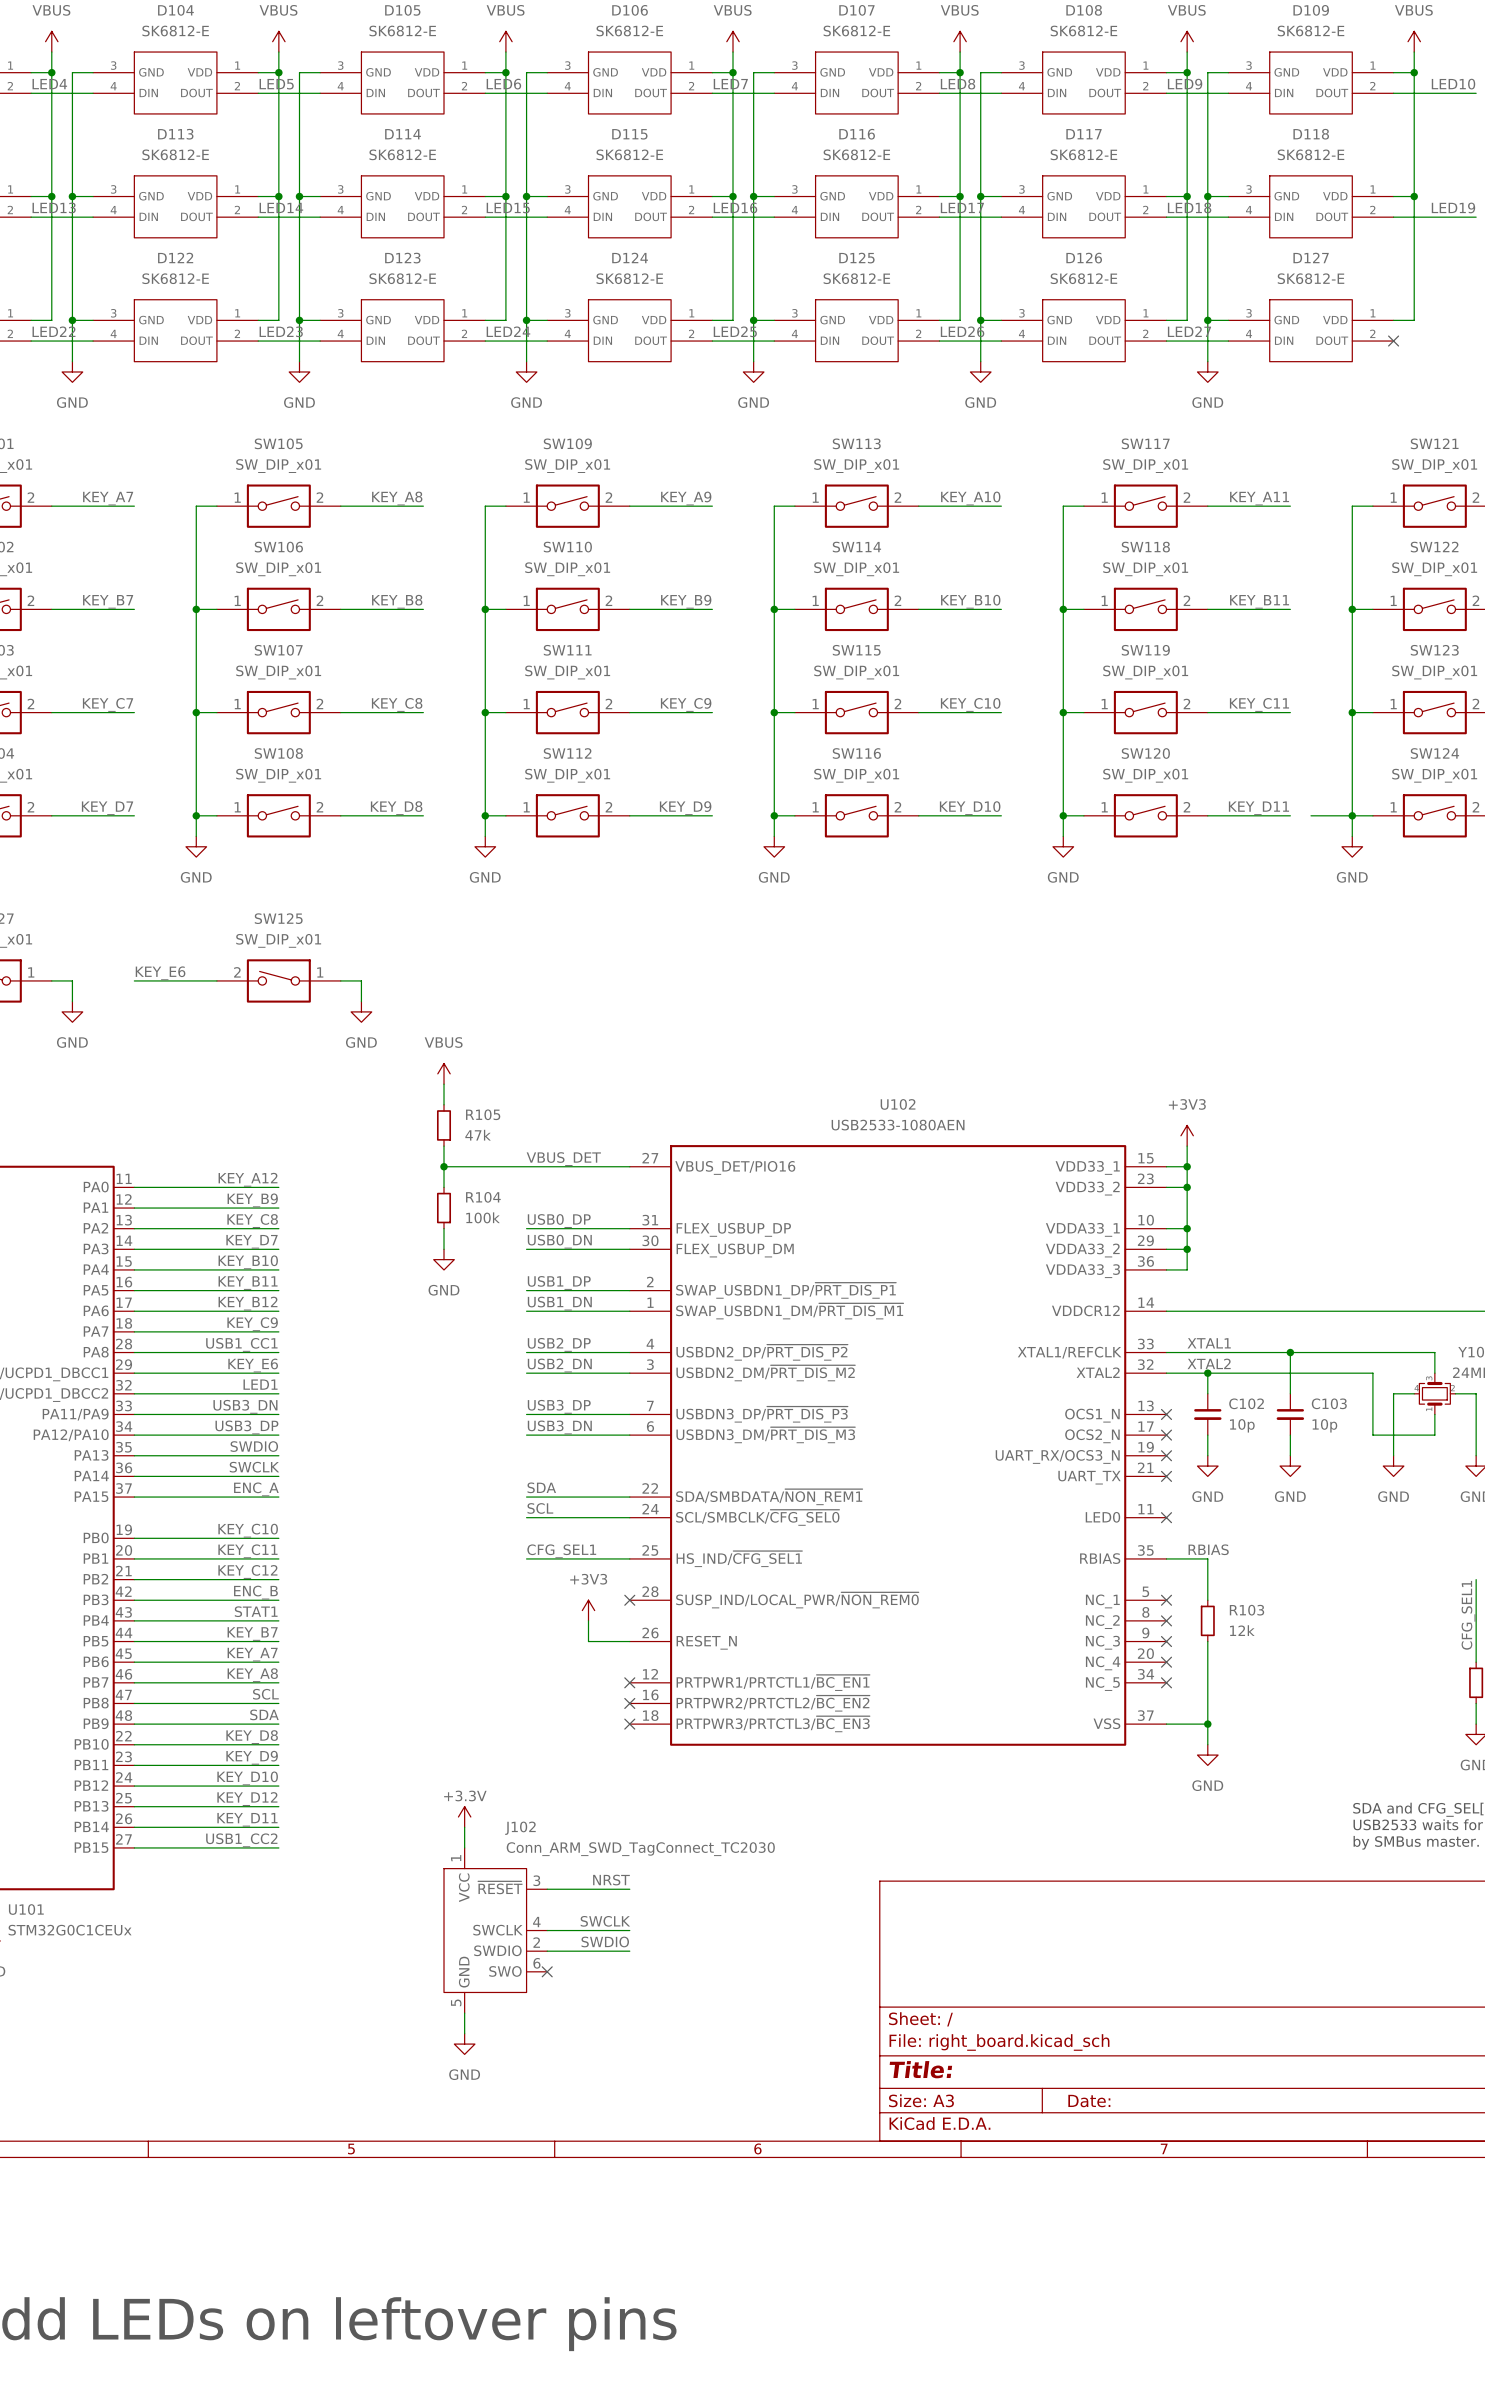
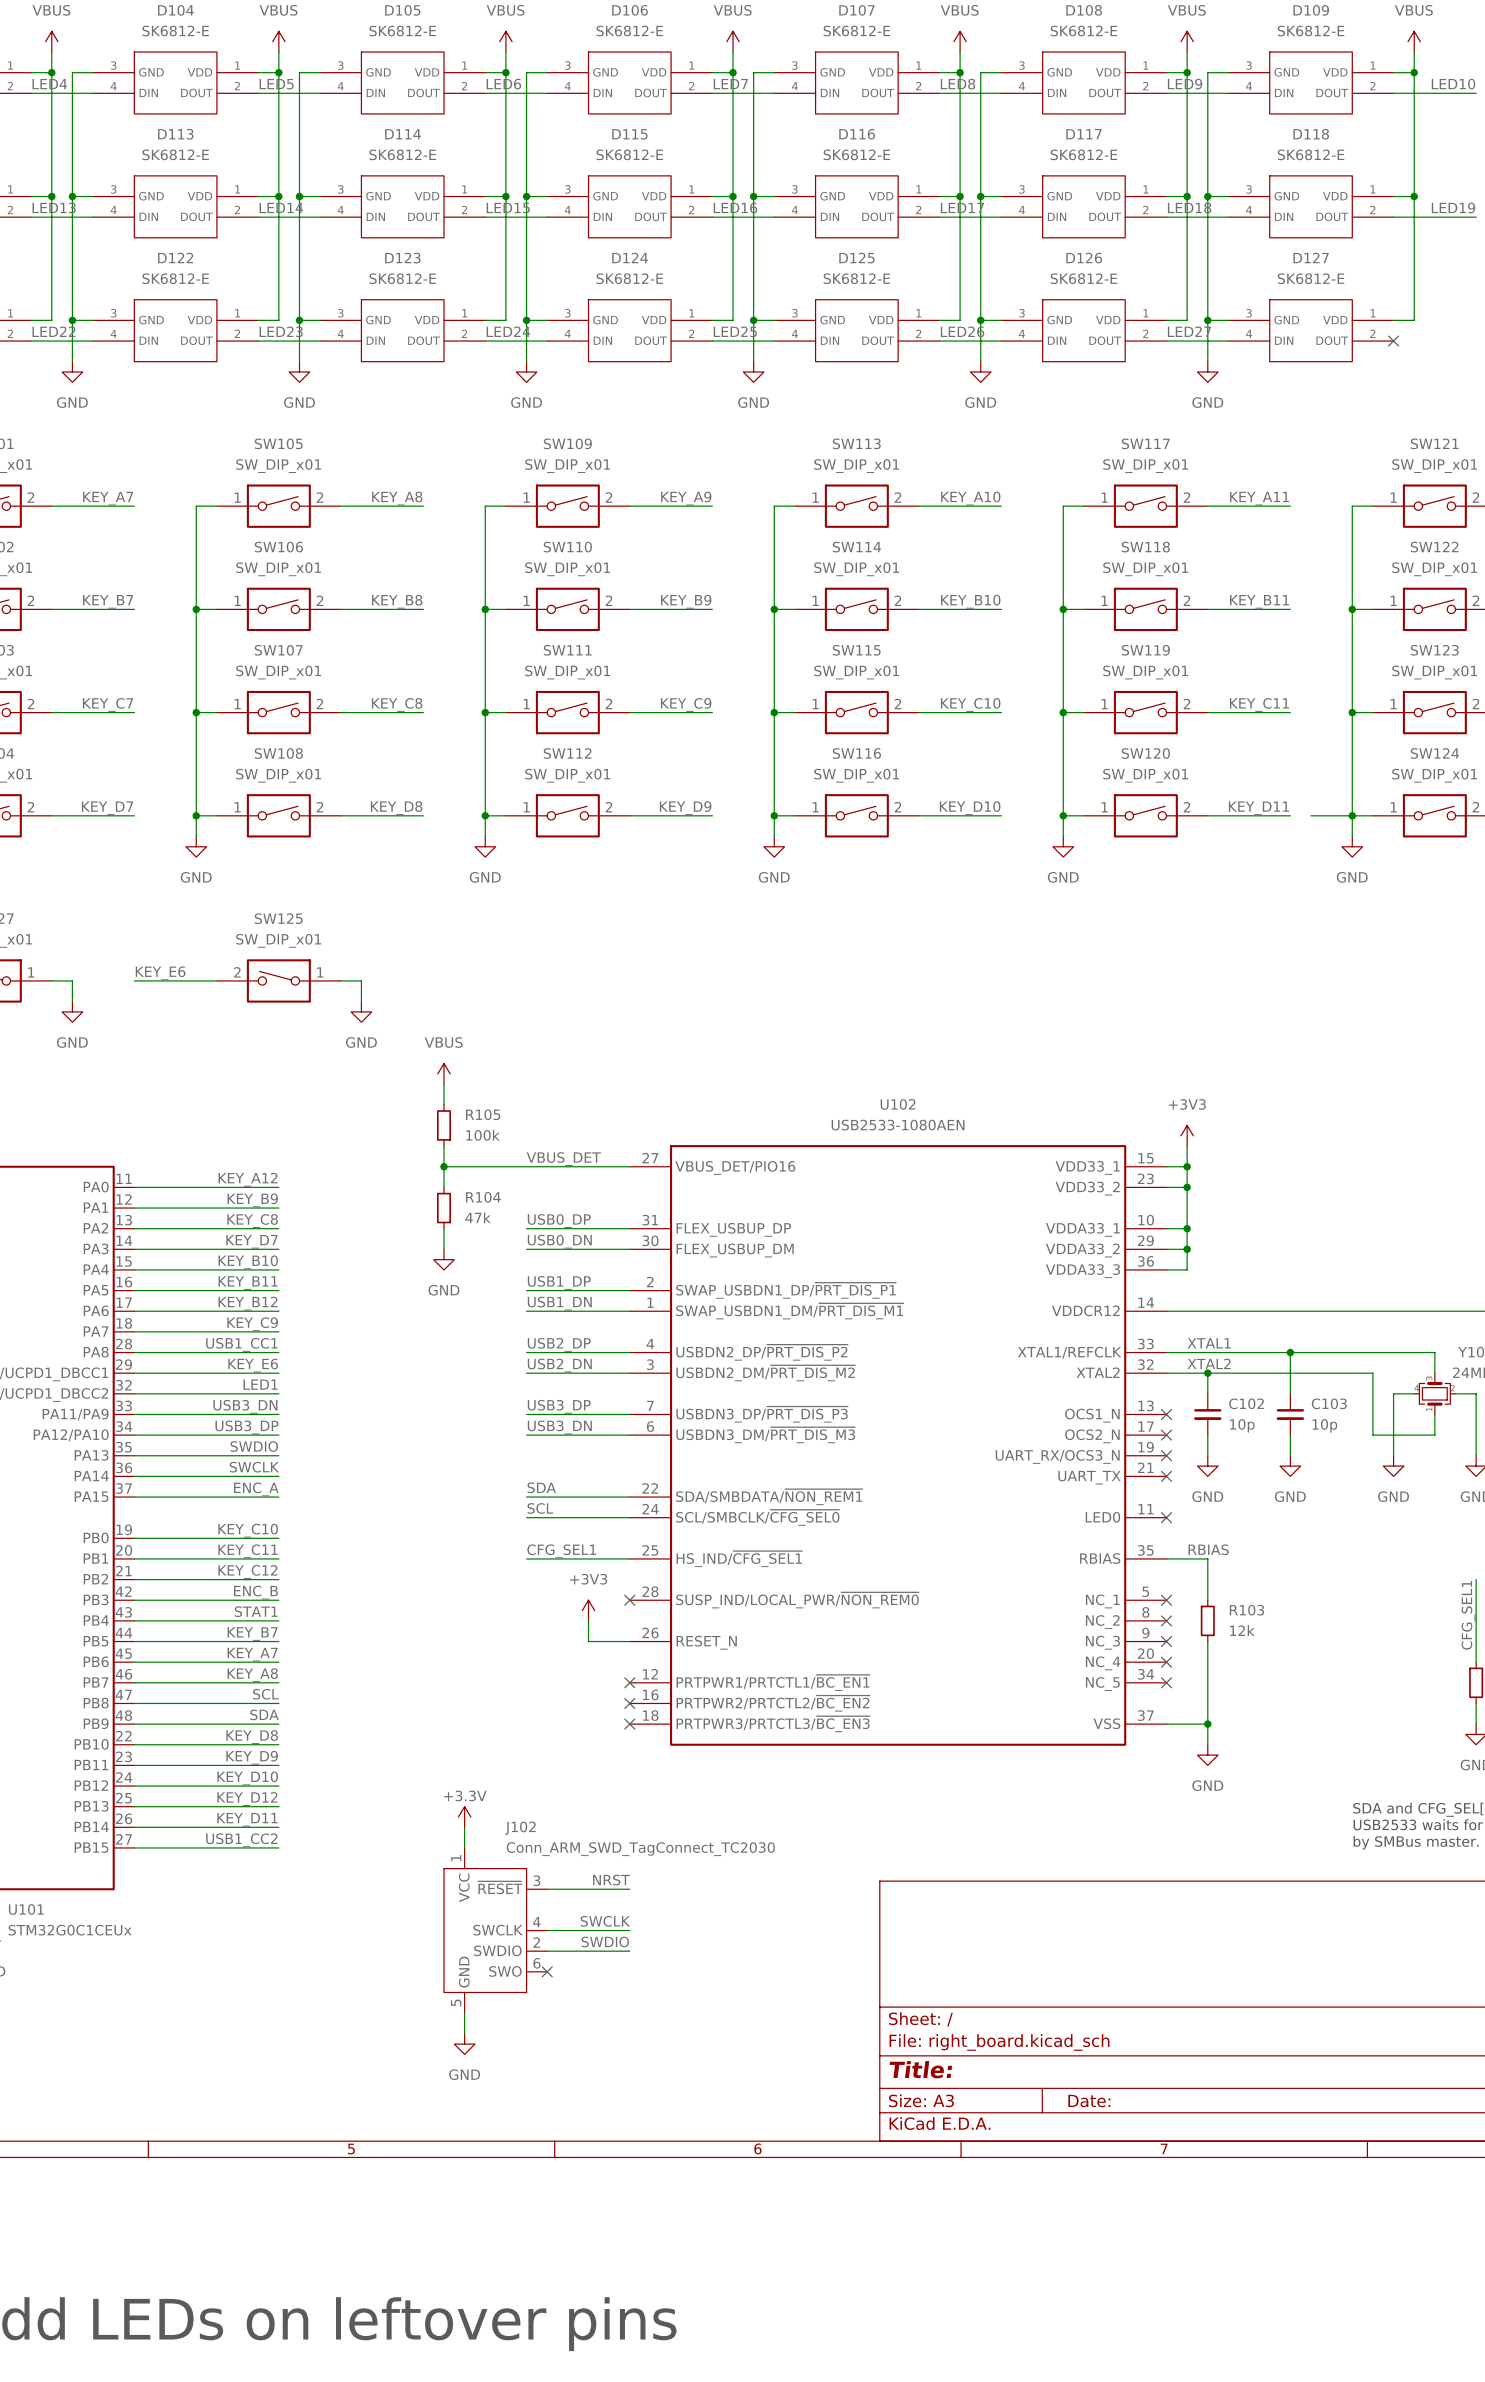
R105 value: 47k (478, 1135) -> 100k (483, 1135)
R104 value: 100k (483, 1217) -> 47k (478, 1217)

